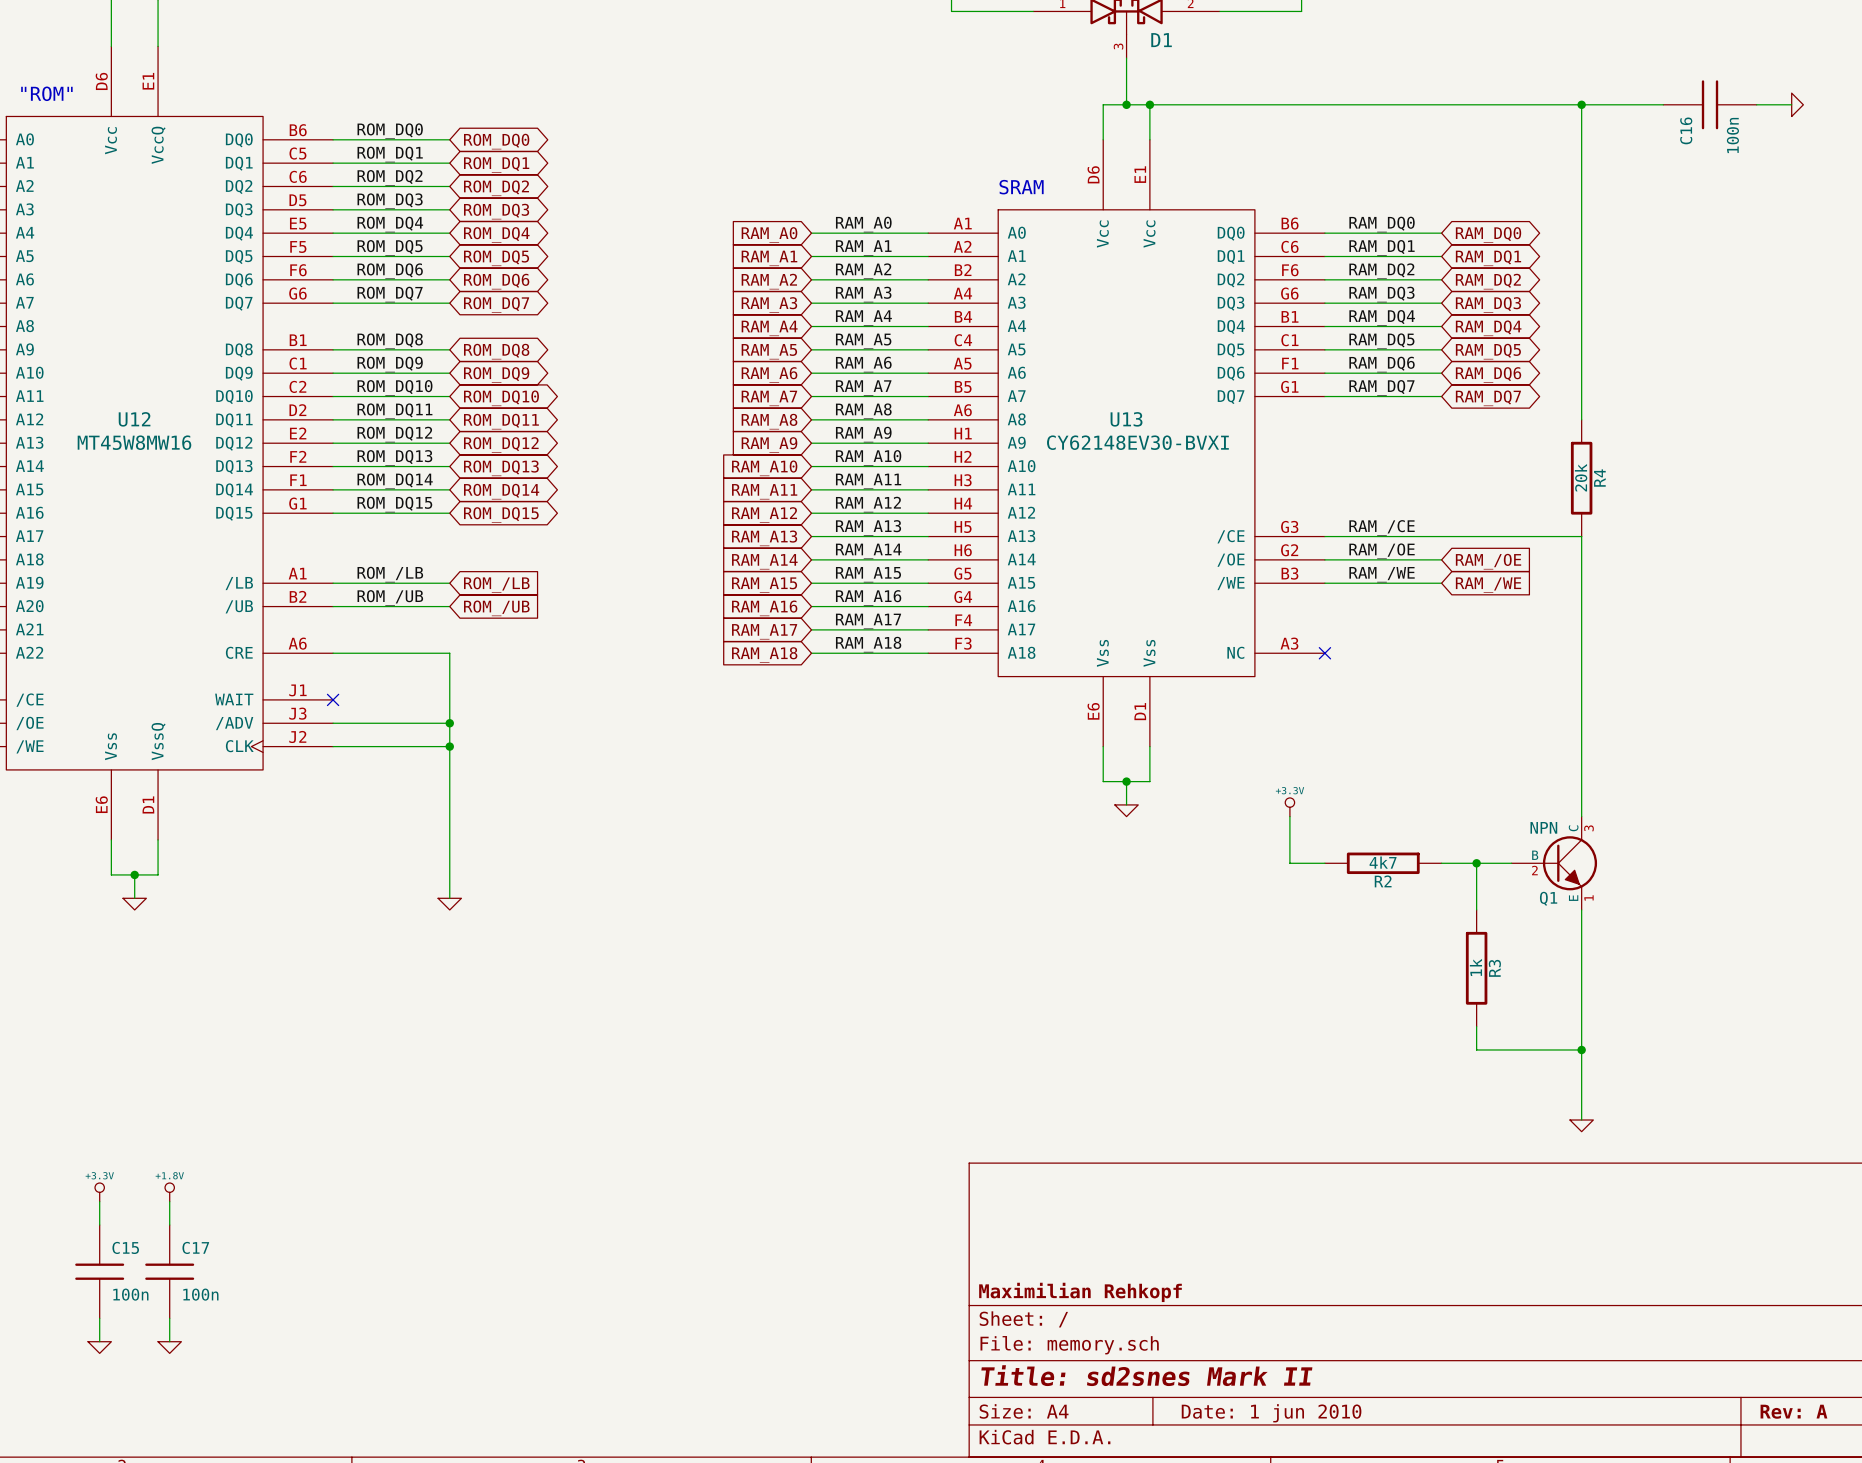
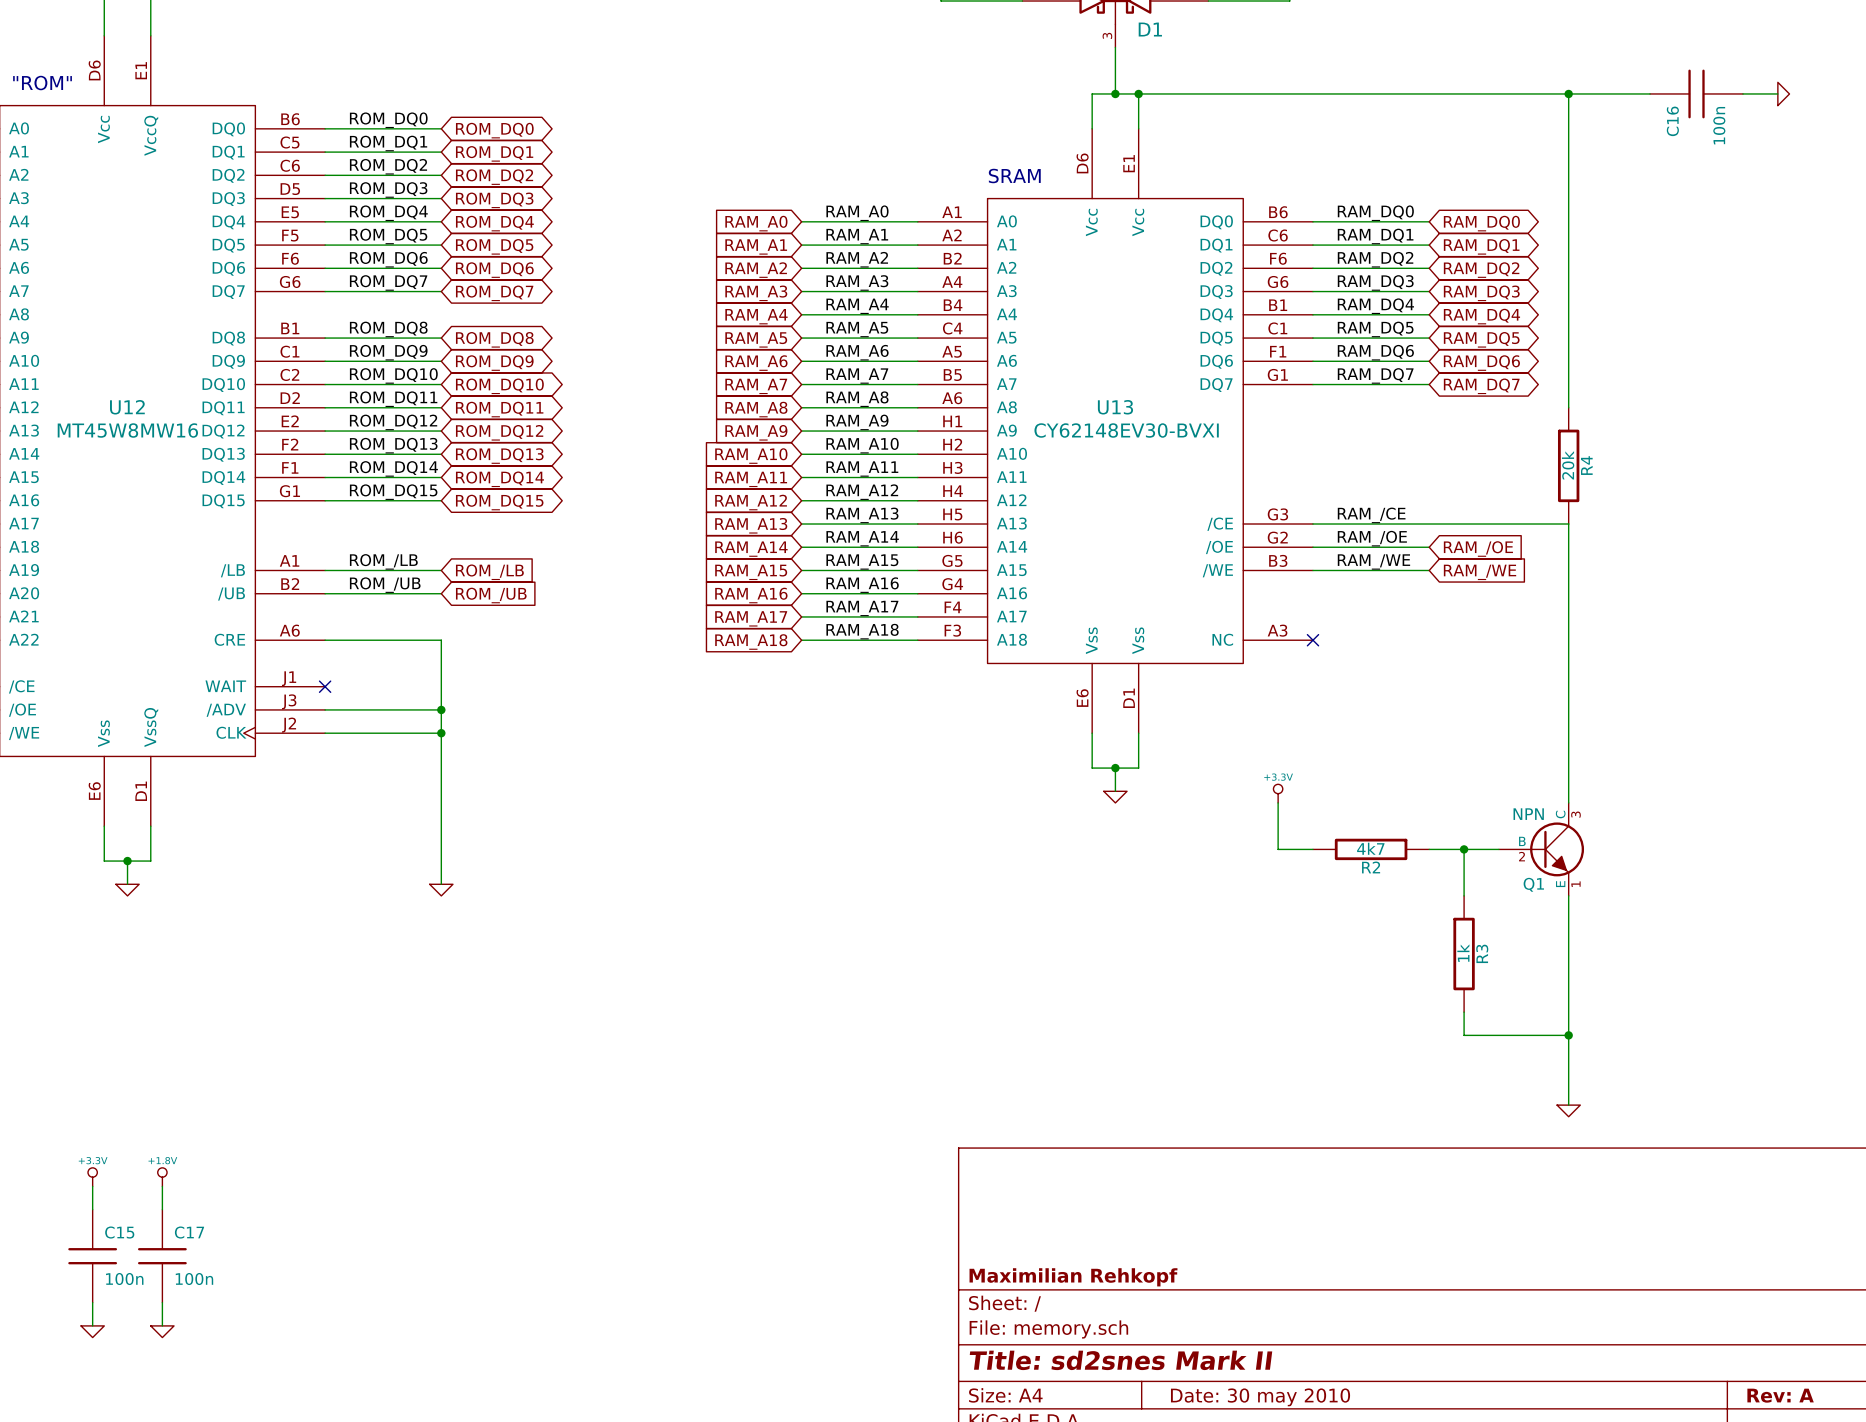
title block: Date: 1 jun 2010 (1271, 1413) -> Date: 30 may 2010 (1260, 1397)

